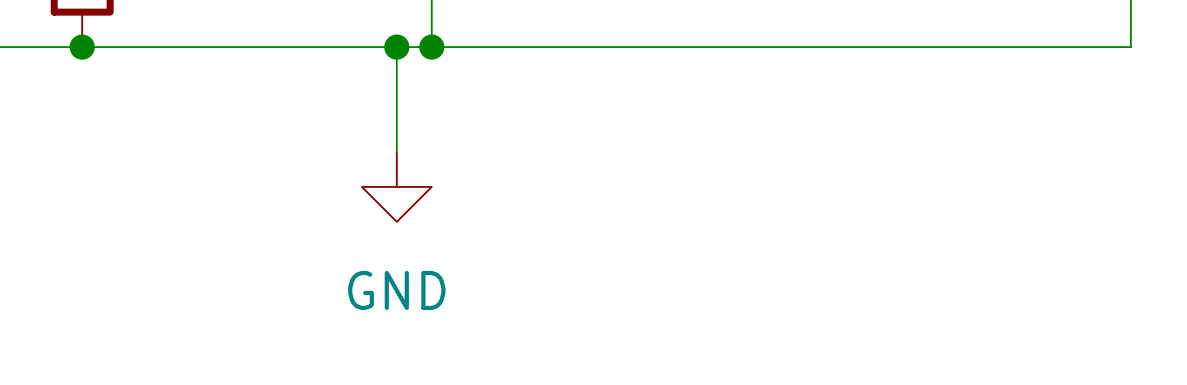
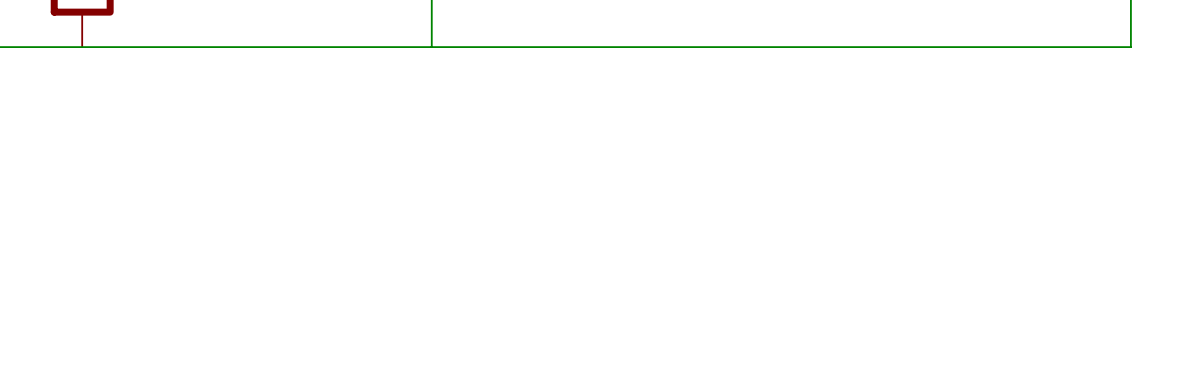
junction: (82, 47) -> none
wire: (396, 47) (396, 151) -> none
junction: (396, 47) -> none
junction: (431, 47) -> none
power symbol: GND (396, 186) -> none

